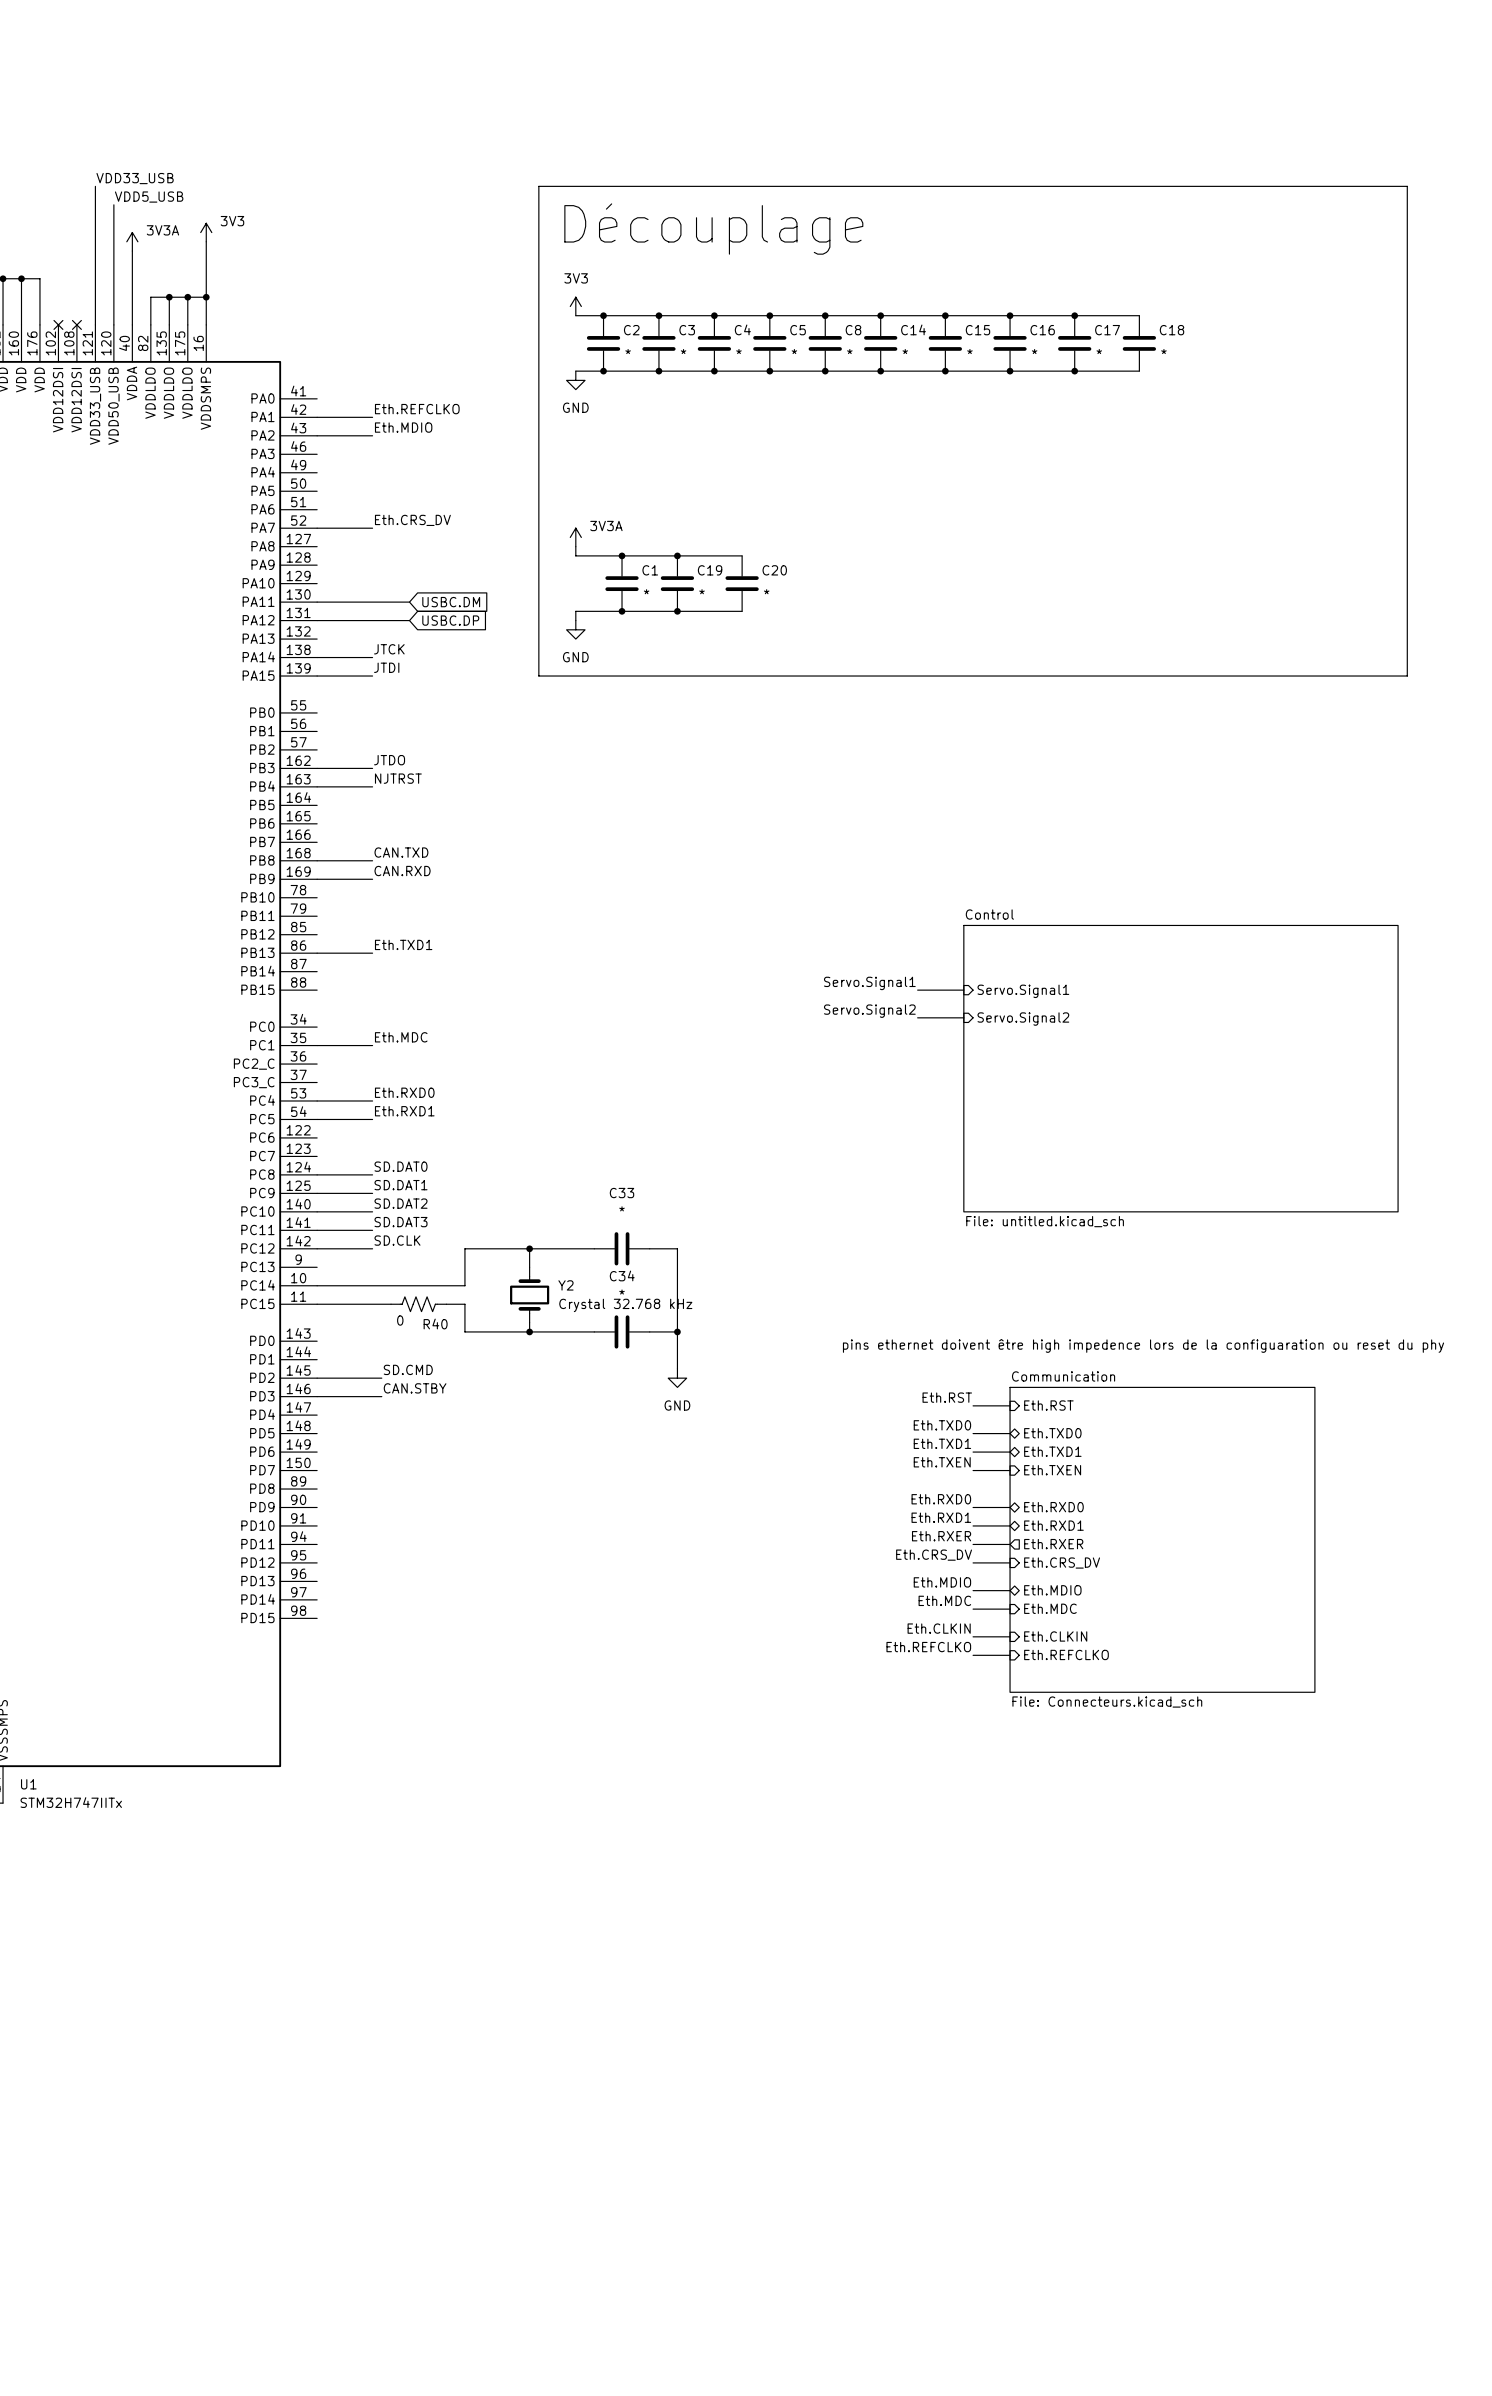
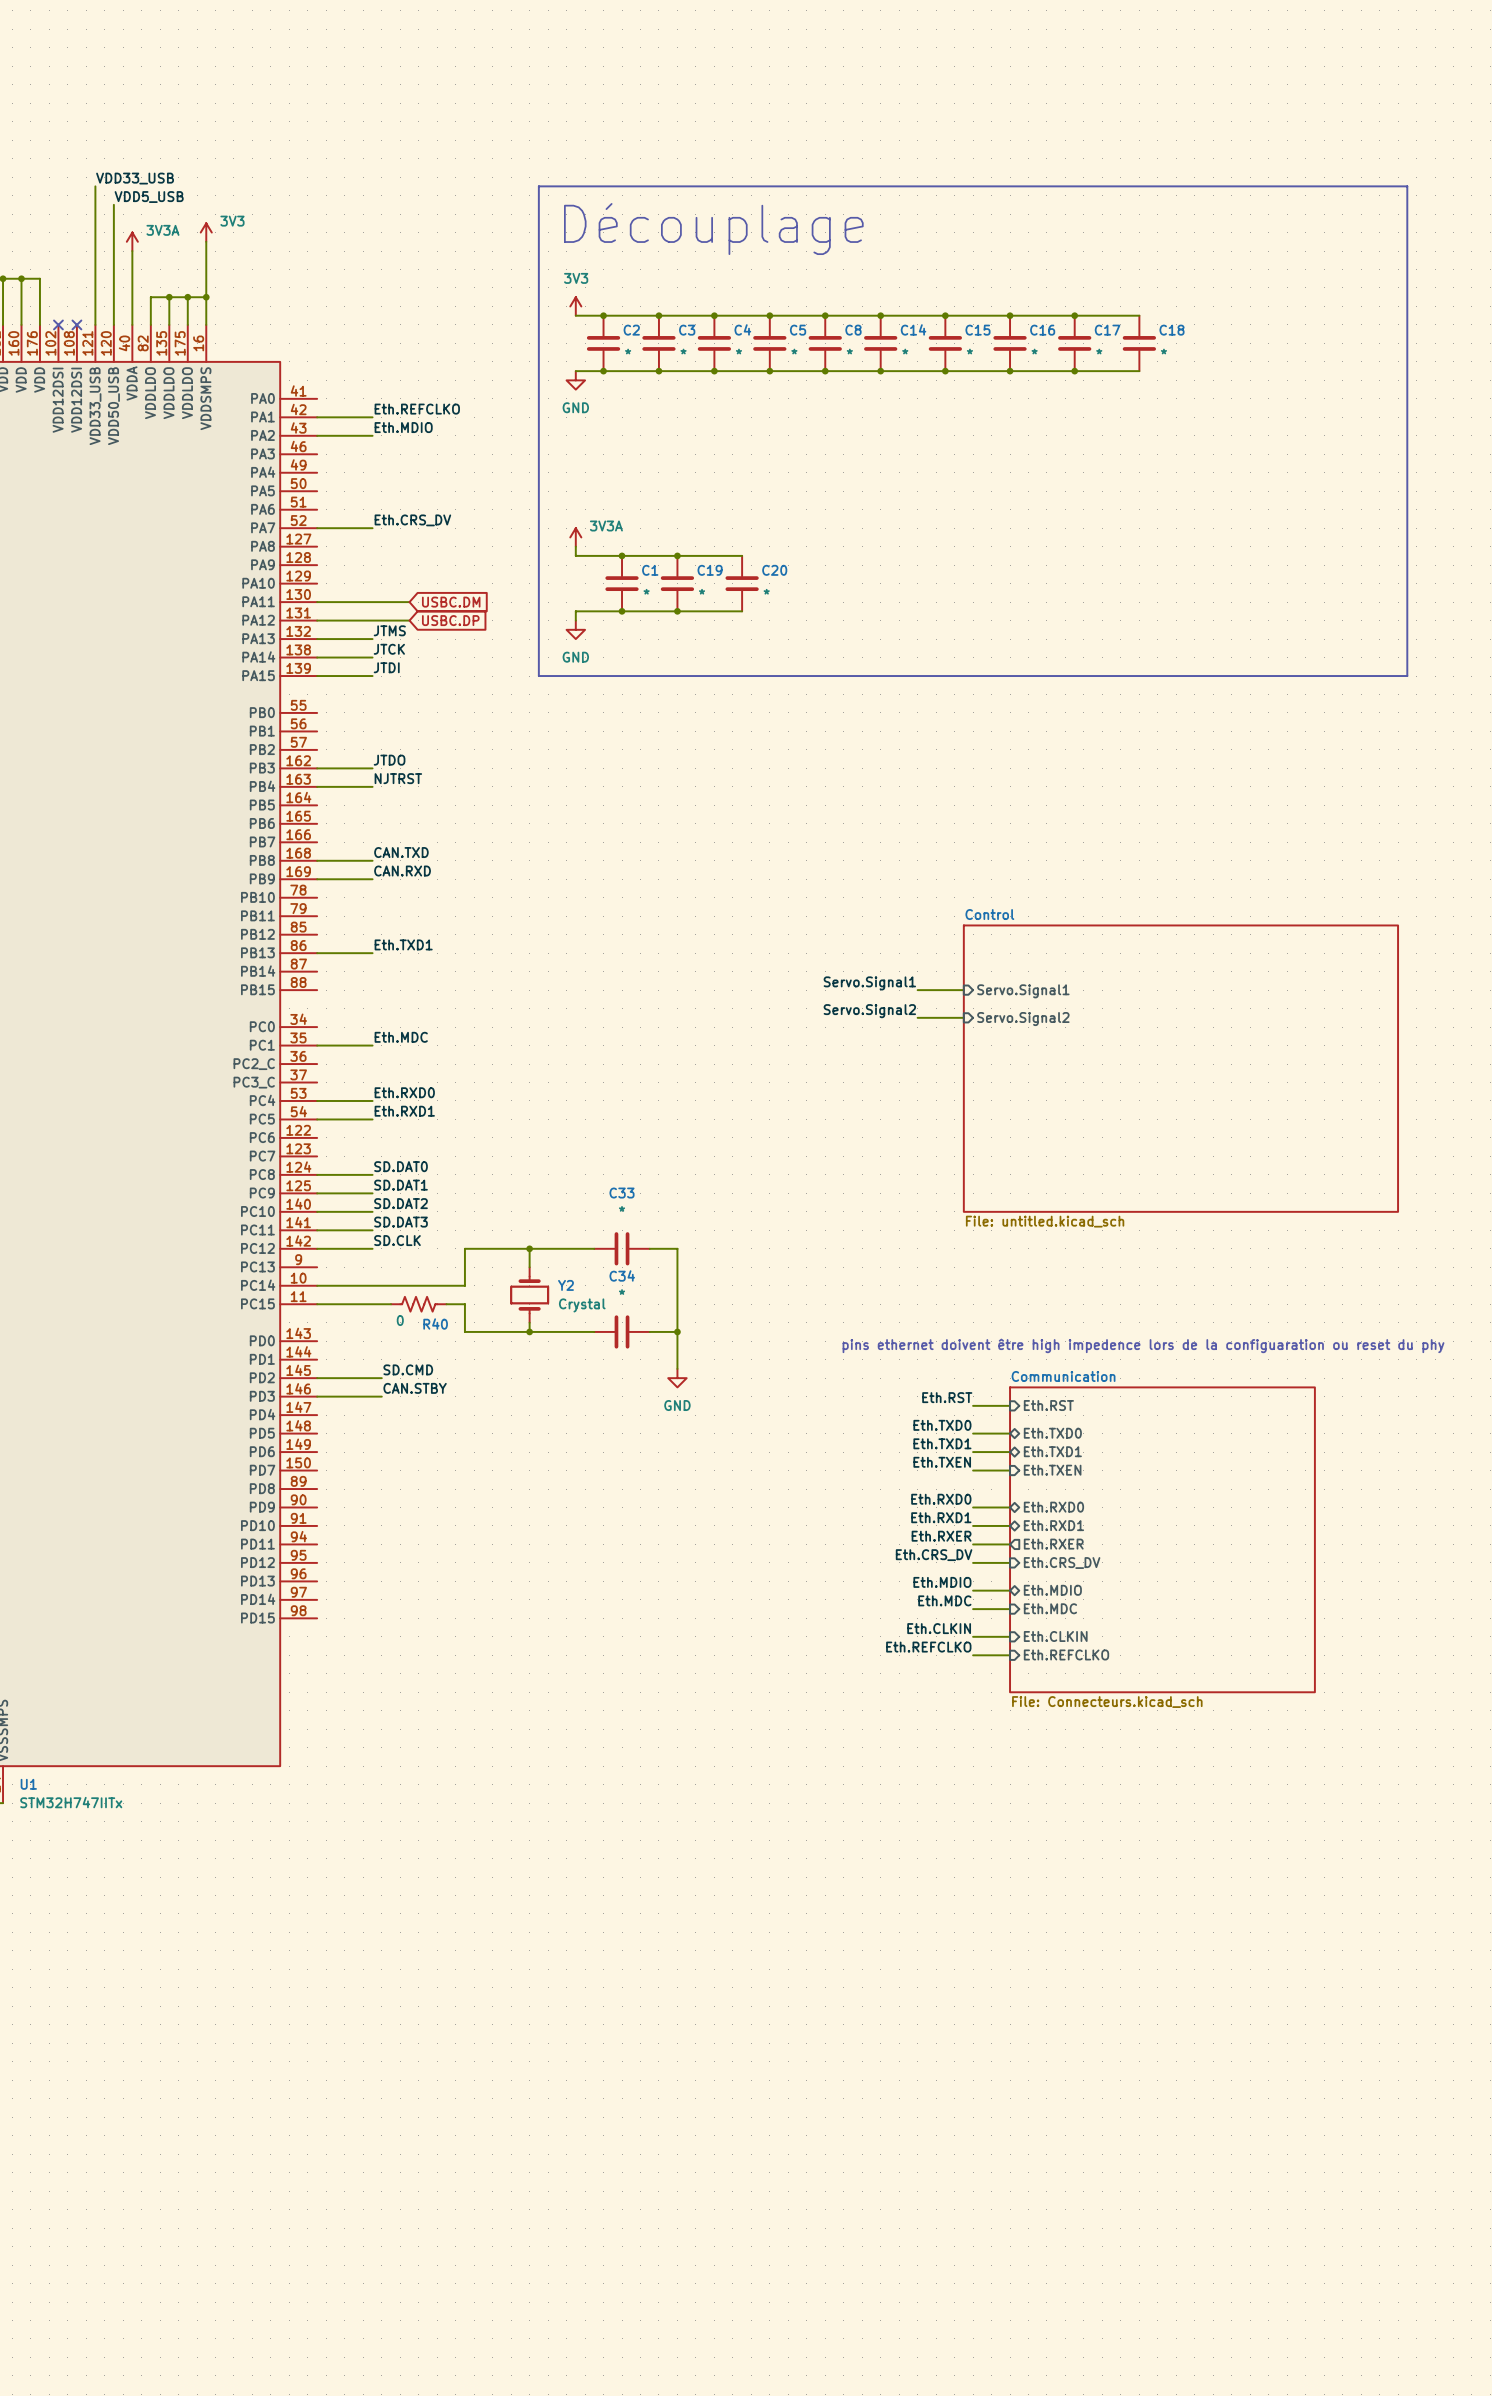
label: none -> JTMS (389, 630)
wire: none -> (317, 639) (372, 639)
Y2 value: Crystal 32.768 kHz (625, 1305) -> Crystal (582, 1305)

